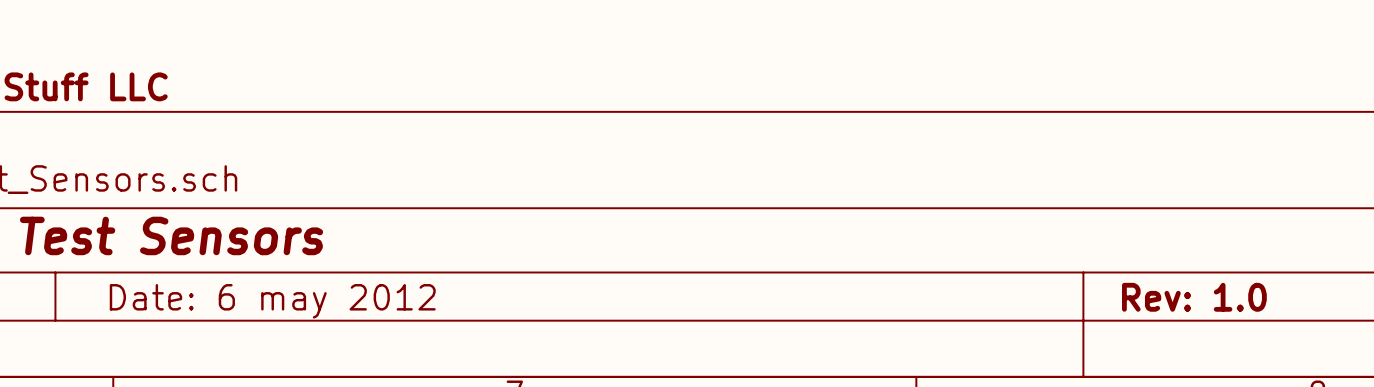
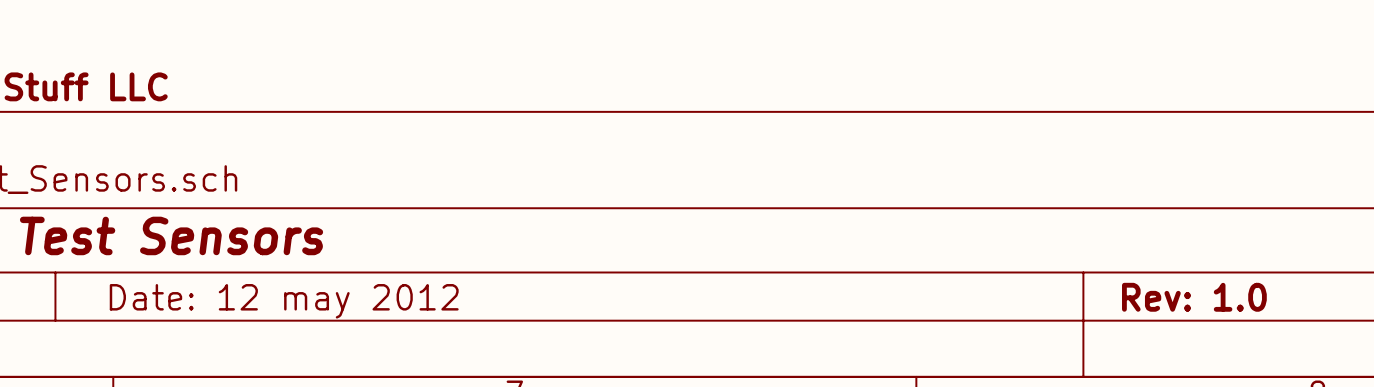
title block: Date: 6 may 2012 (272, 301) -> Date: 12 may 2012 (284, 301)

